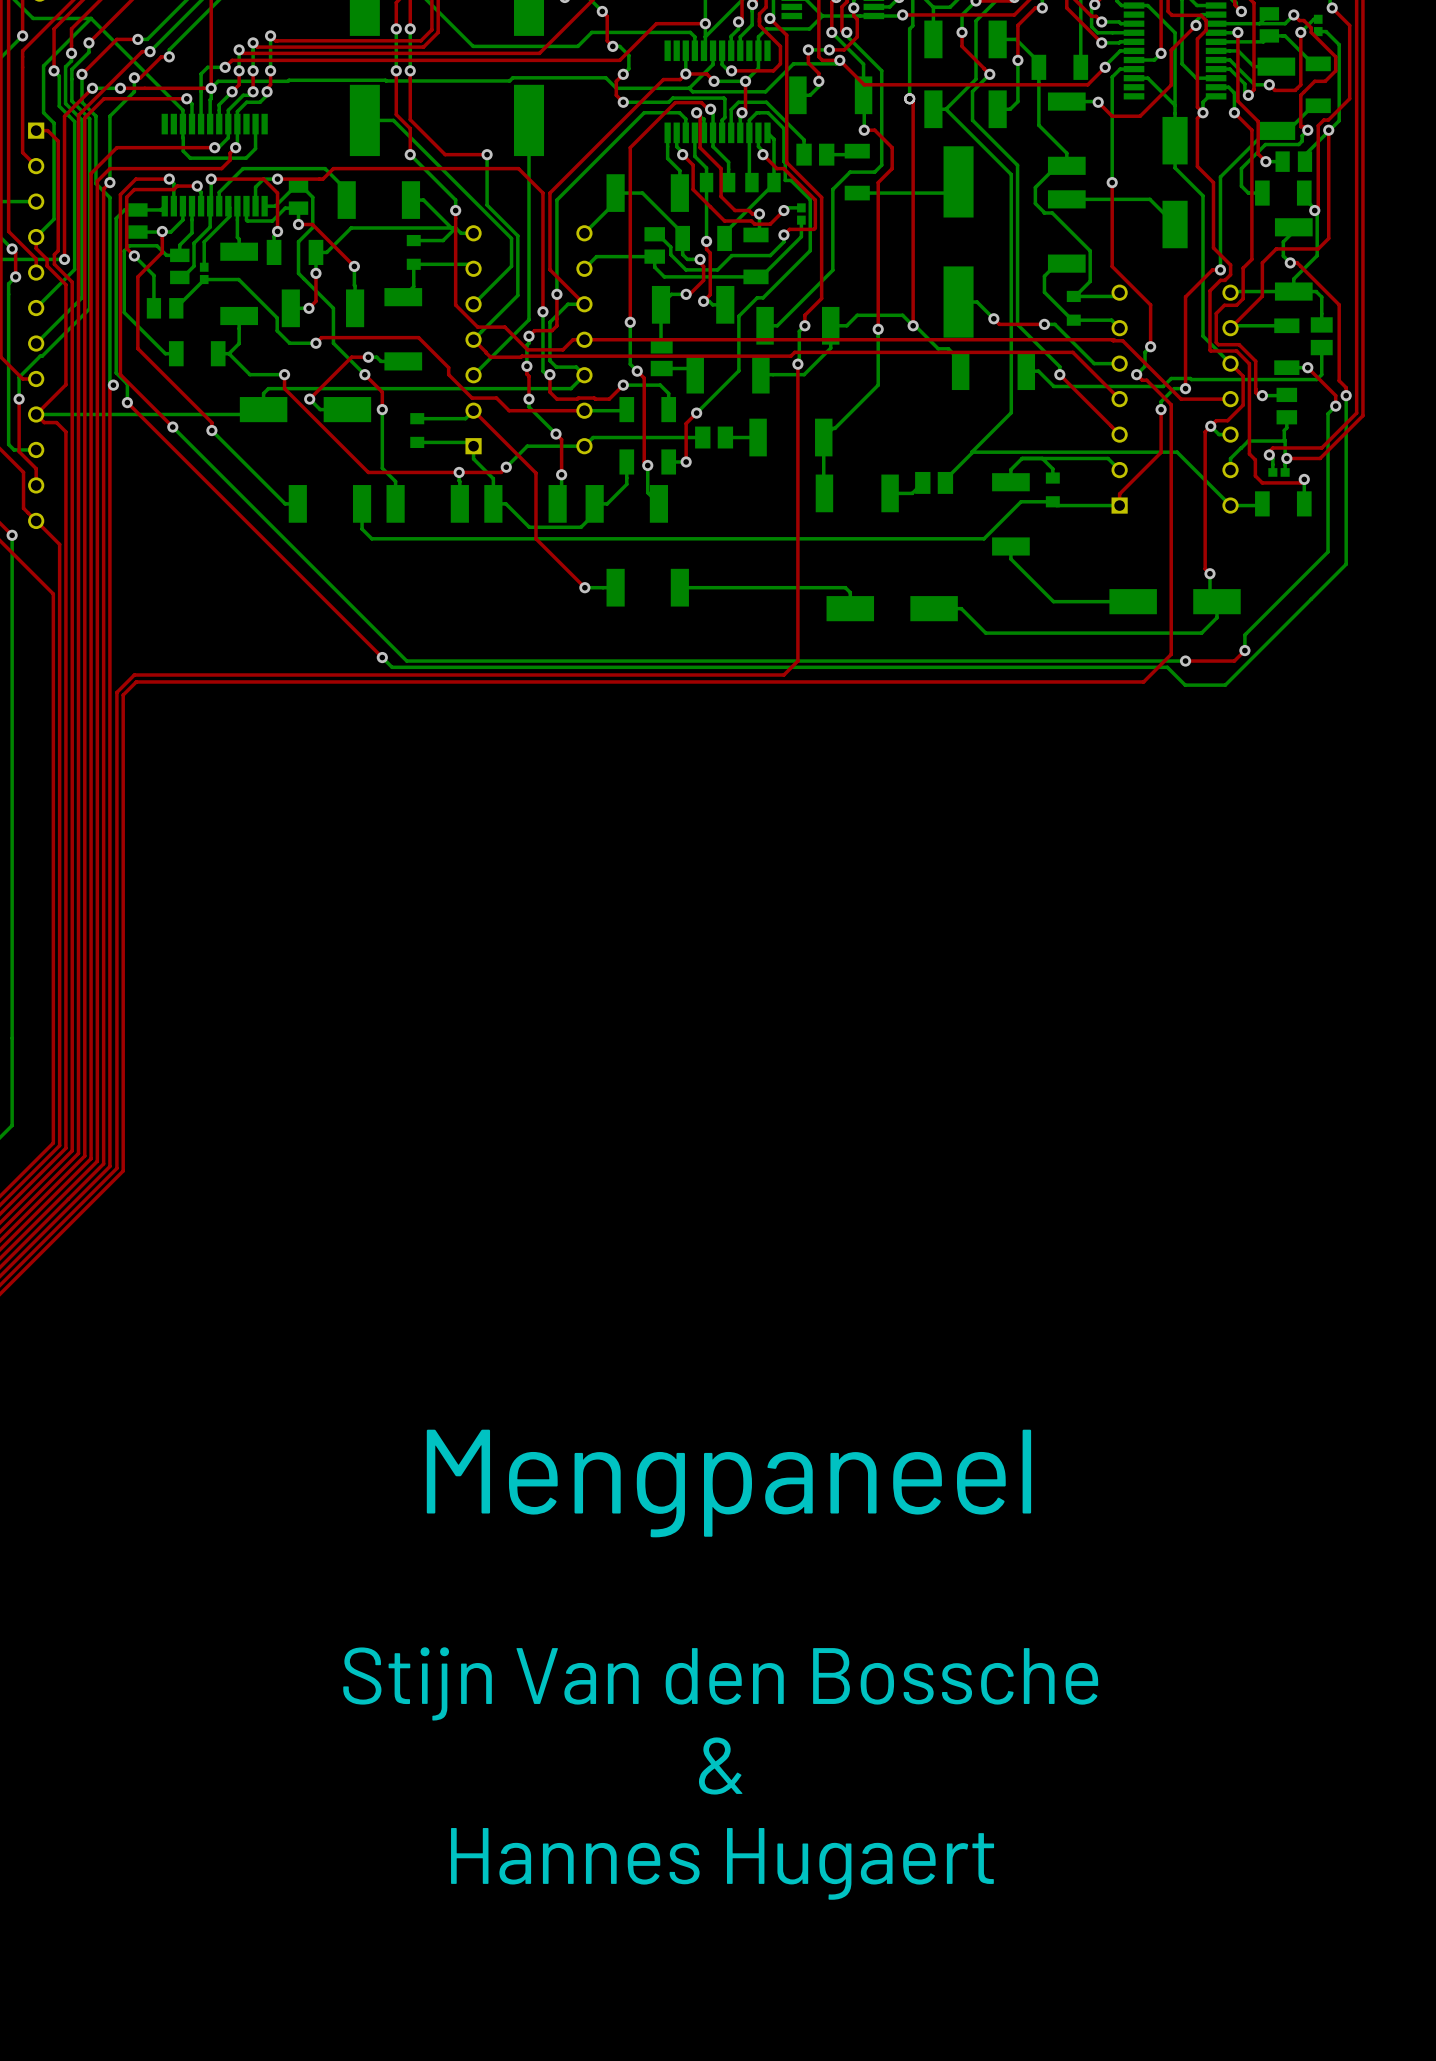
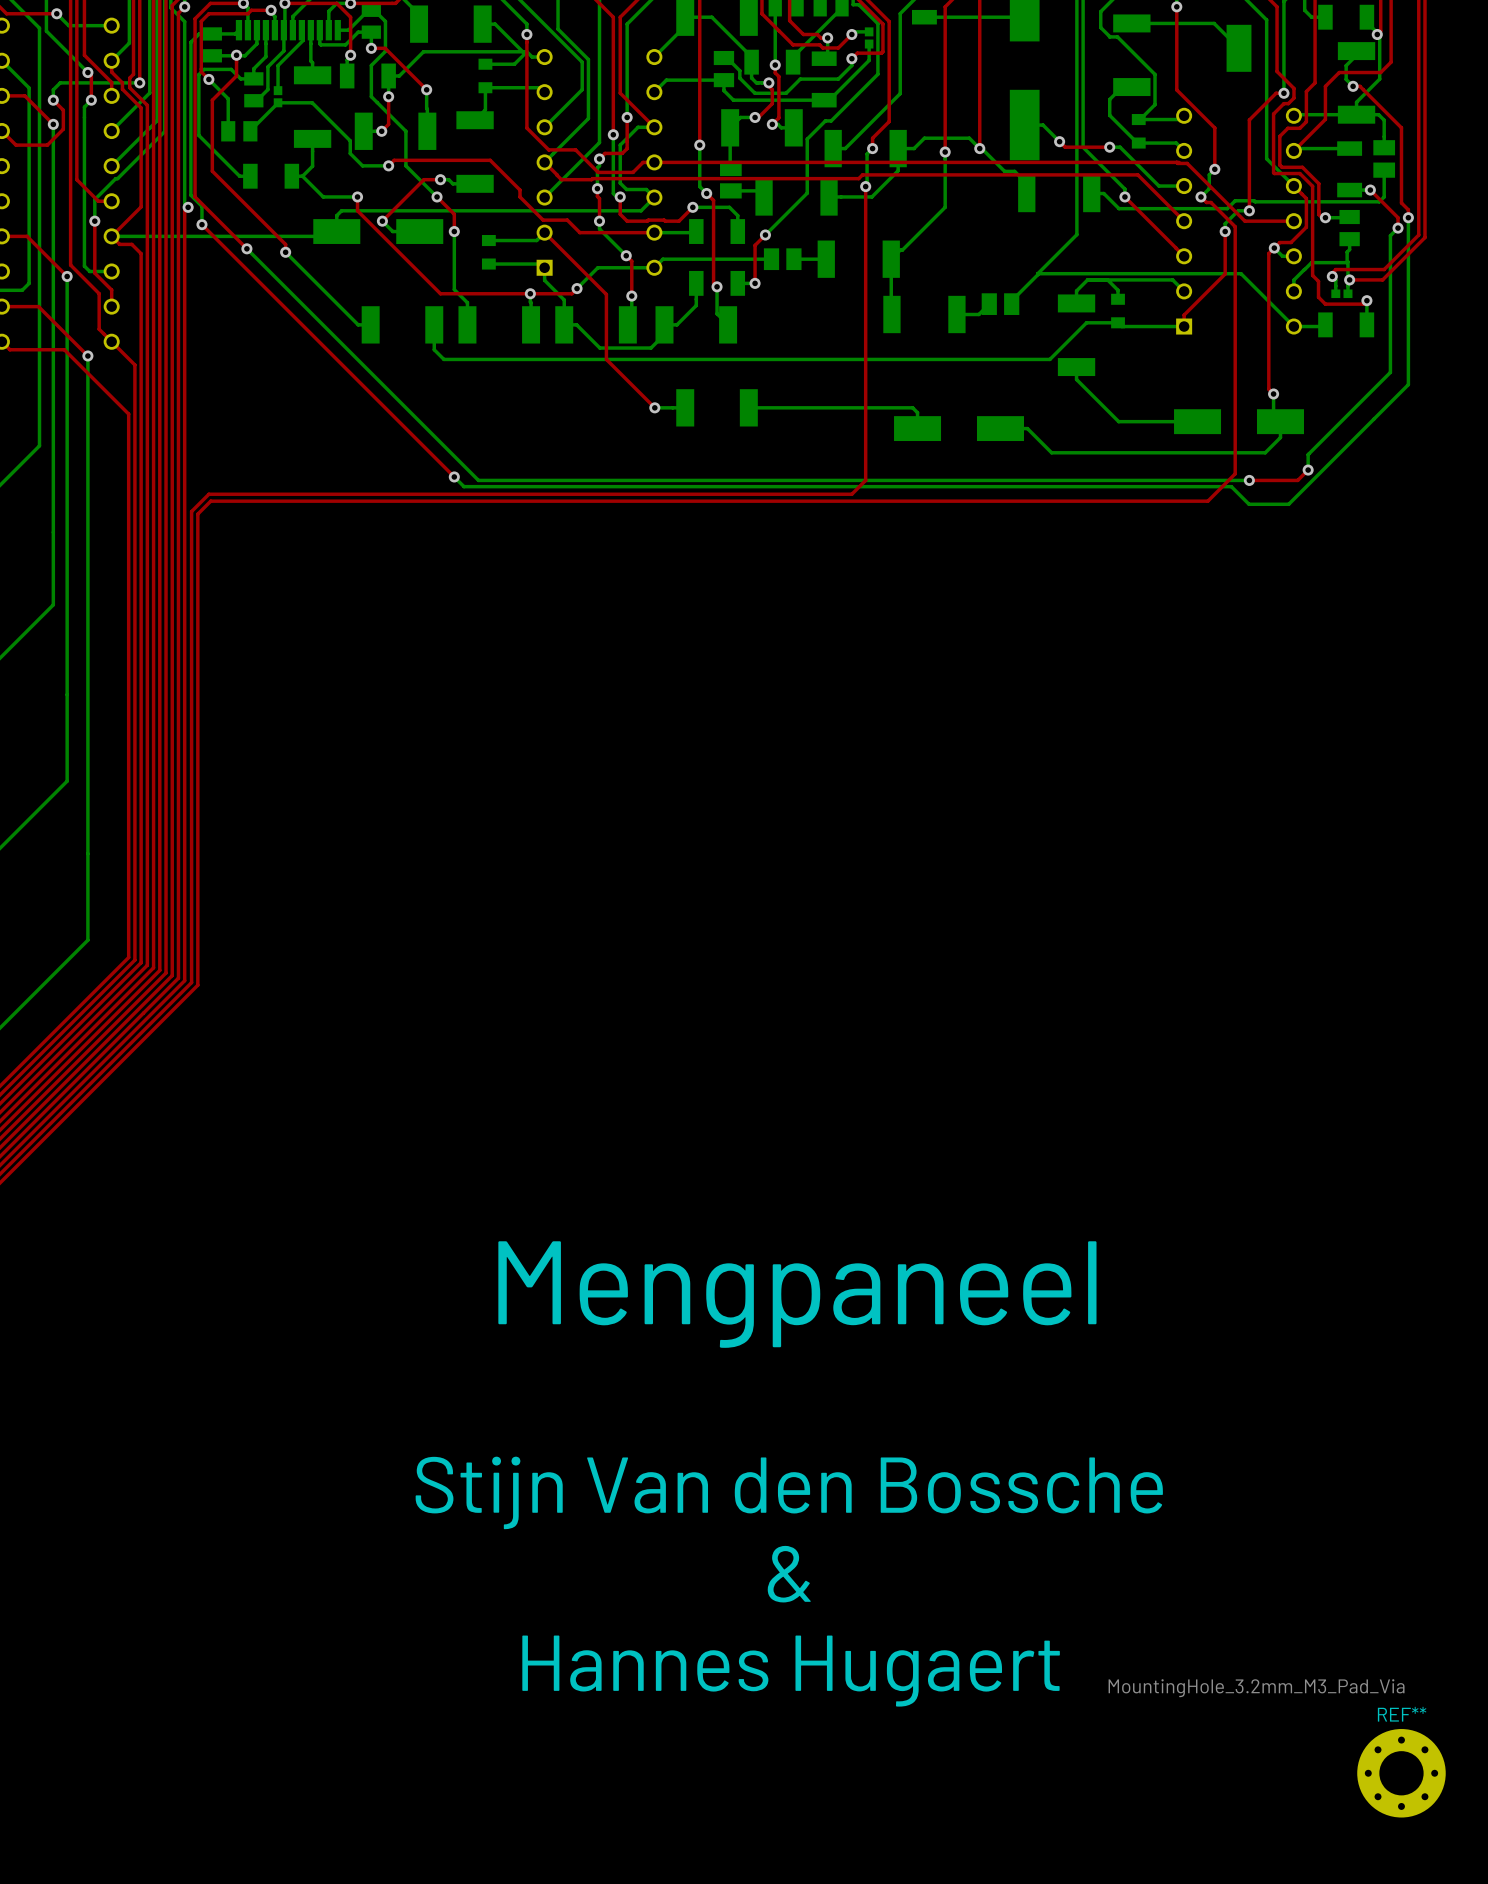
REF**: none -> MountingHole_3.2mm_M3_Pad_Via (1401, 1773)

